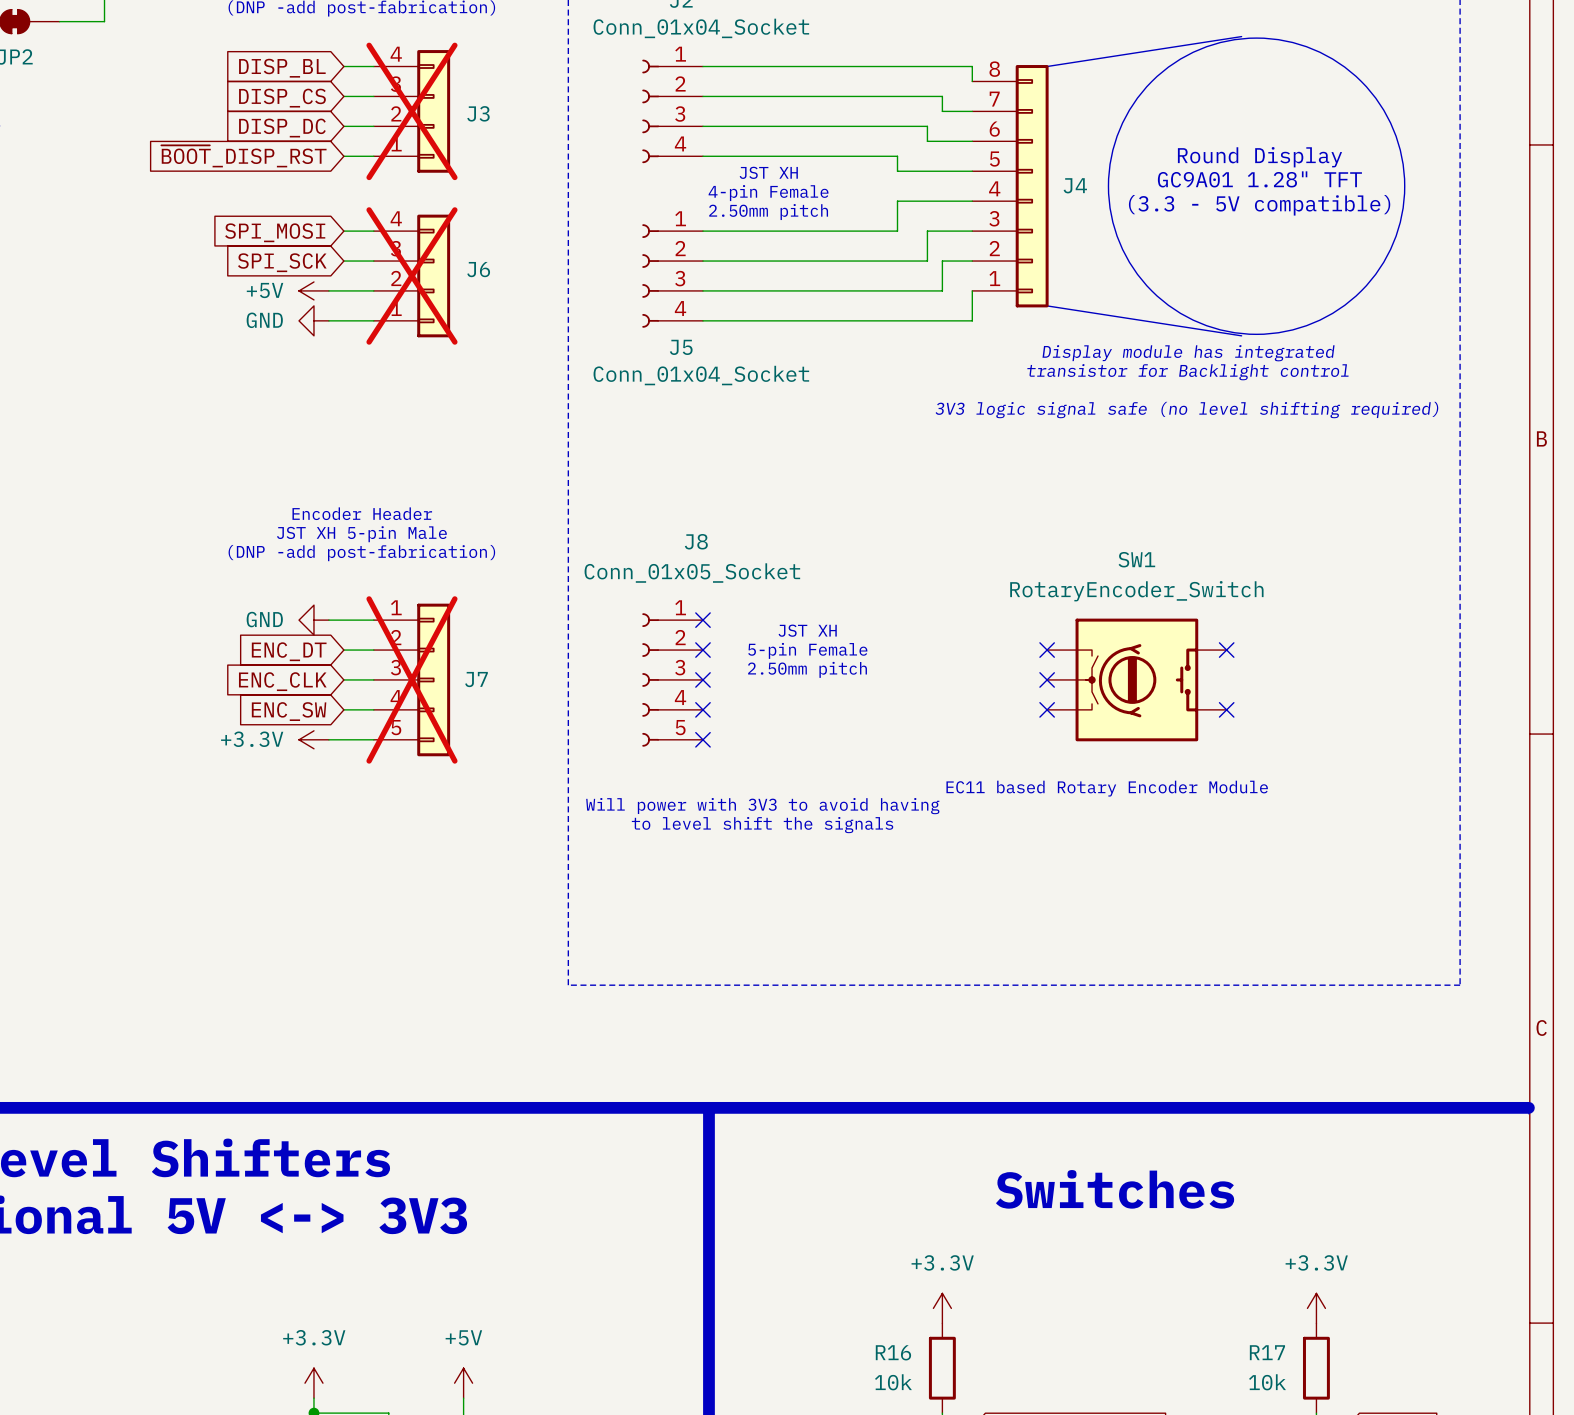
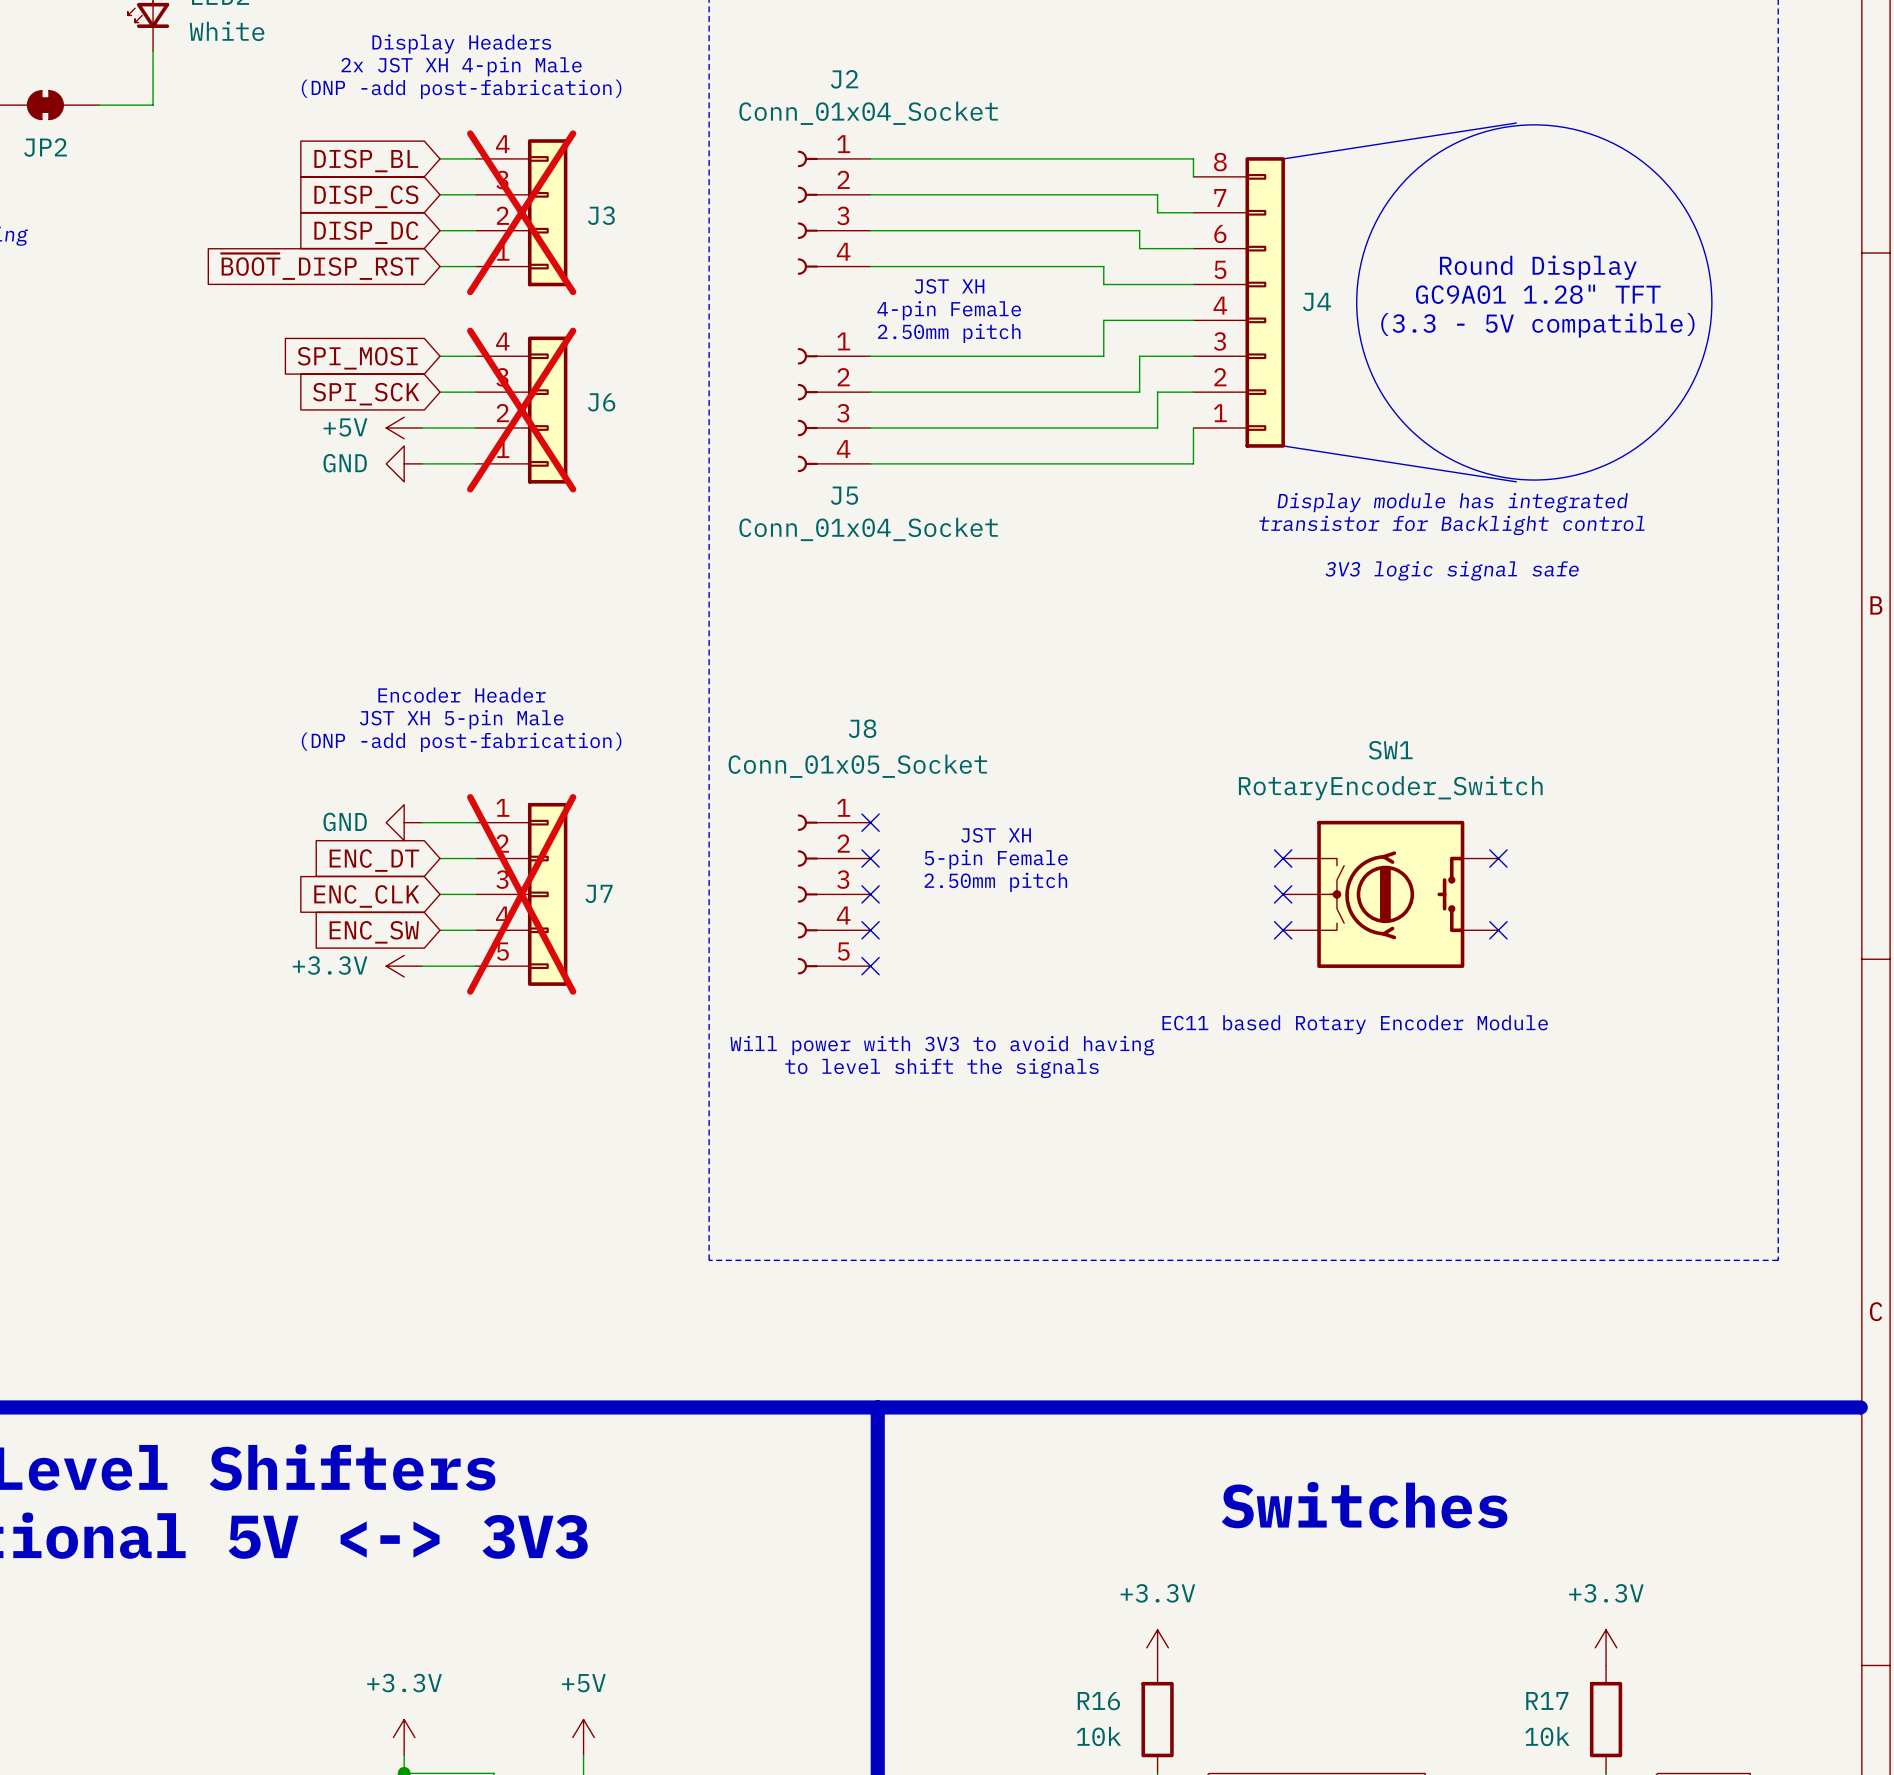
text: 3V3 logic signal safe (no level shifting required) (1186, 410) -> 3V3 logic signal safe (1452, 570)

